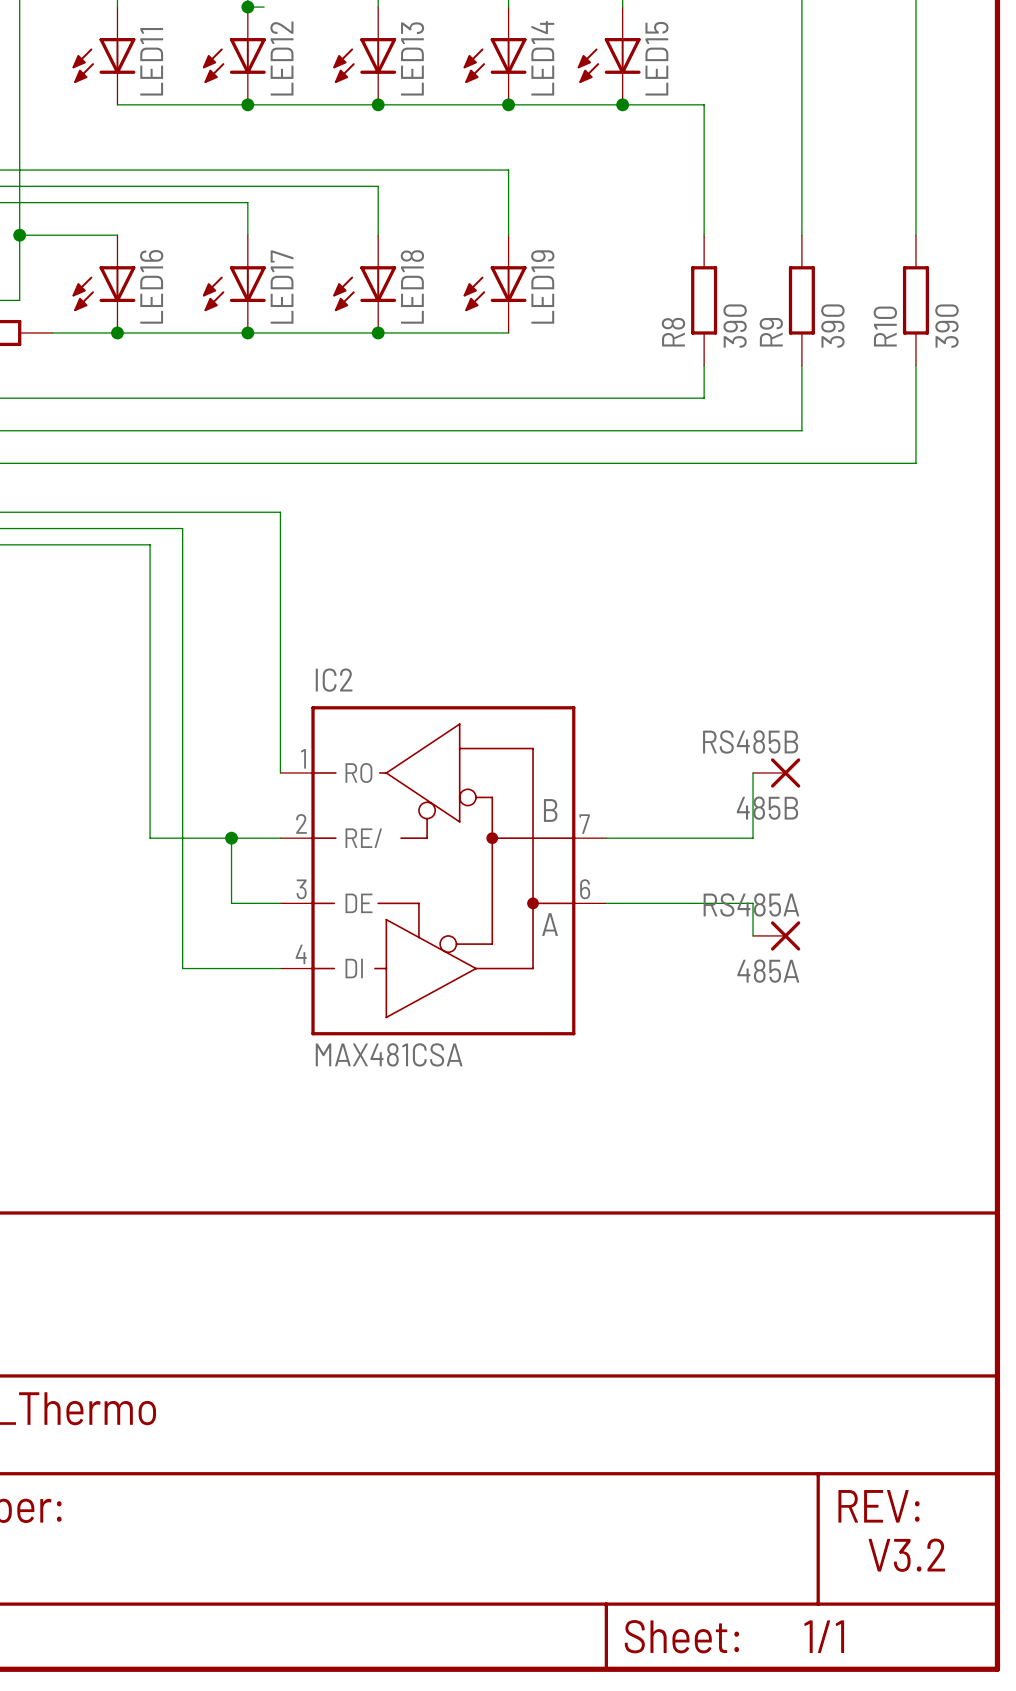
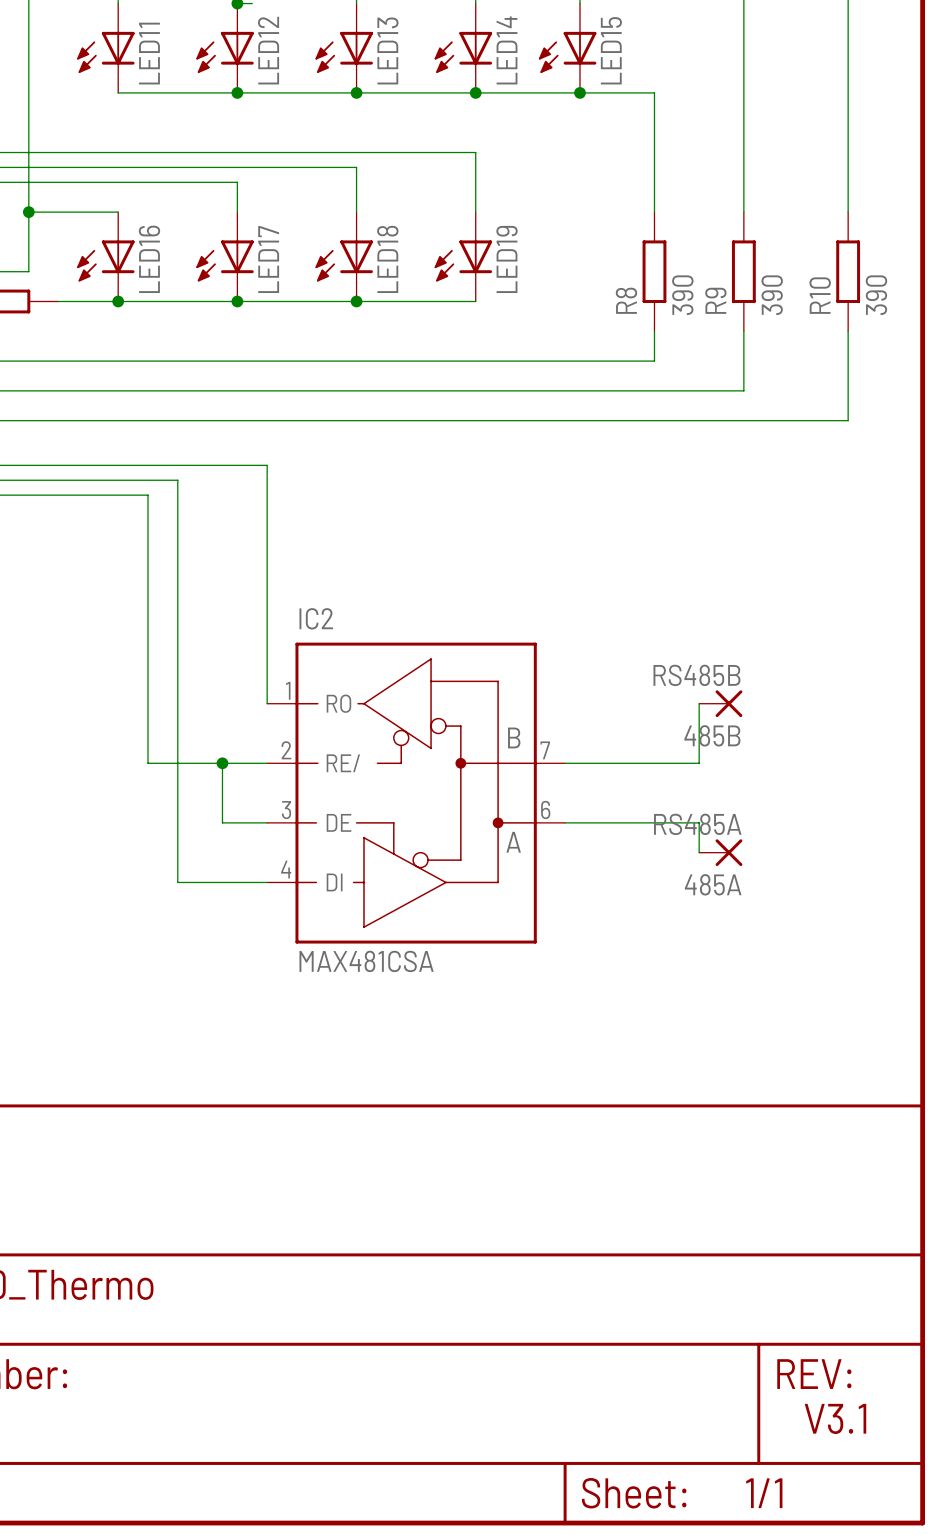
text: V3.2 (906, 1555) -> V3.1 (835, 1418)

